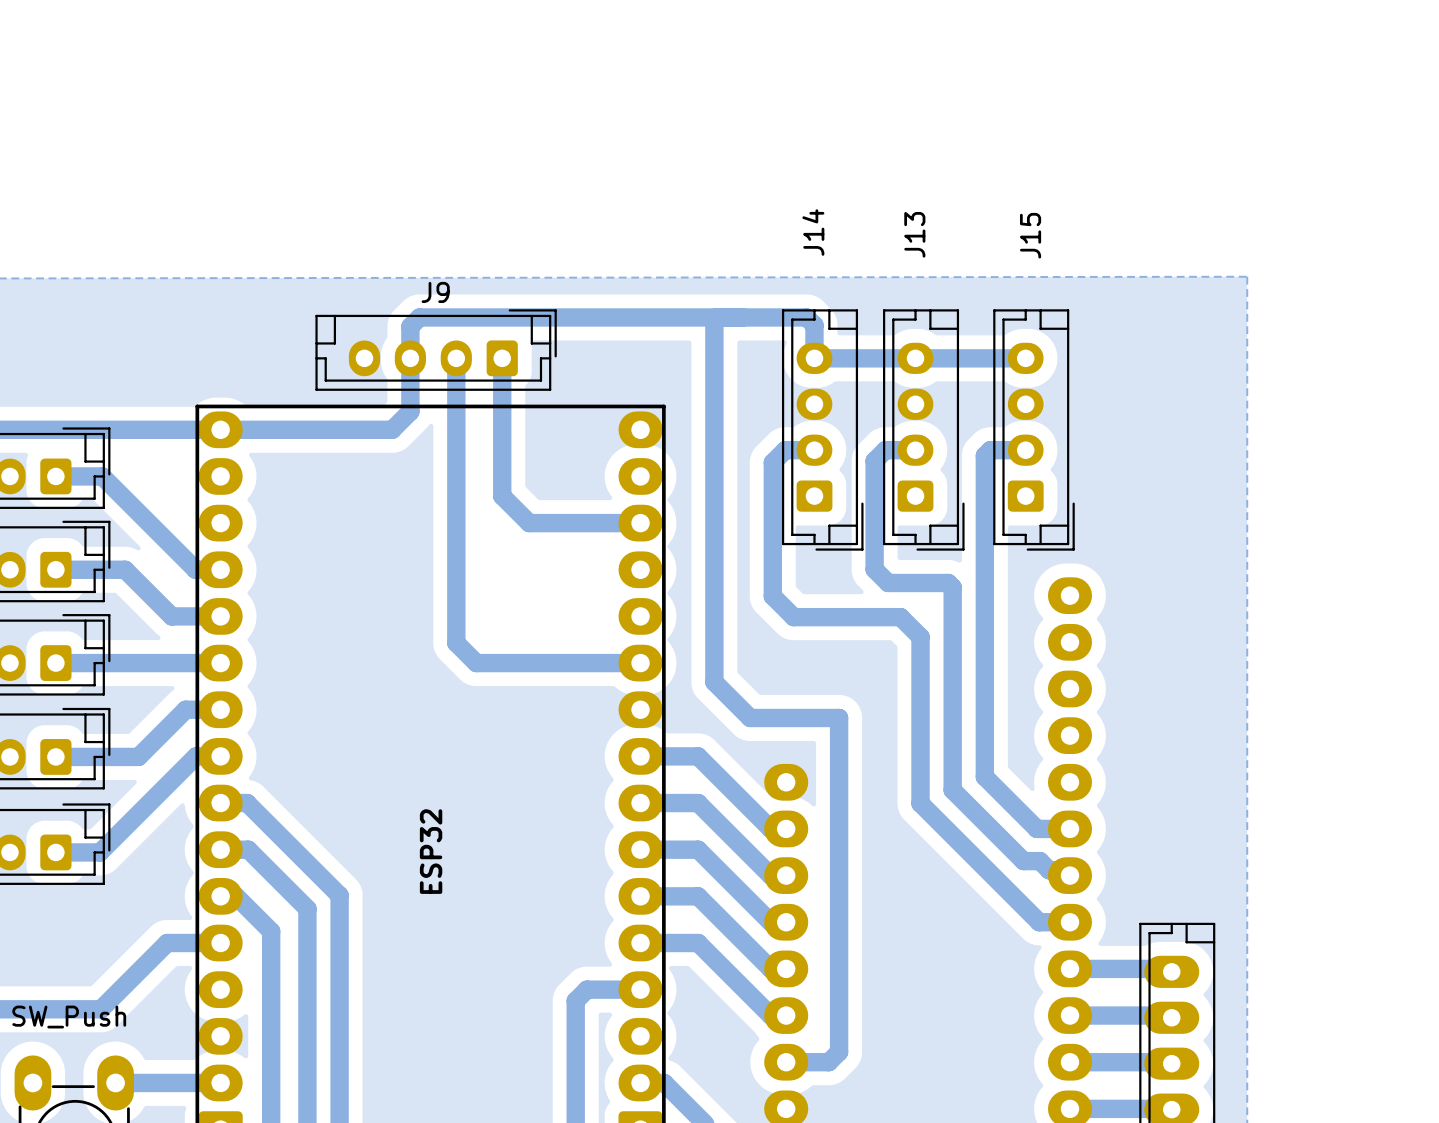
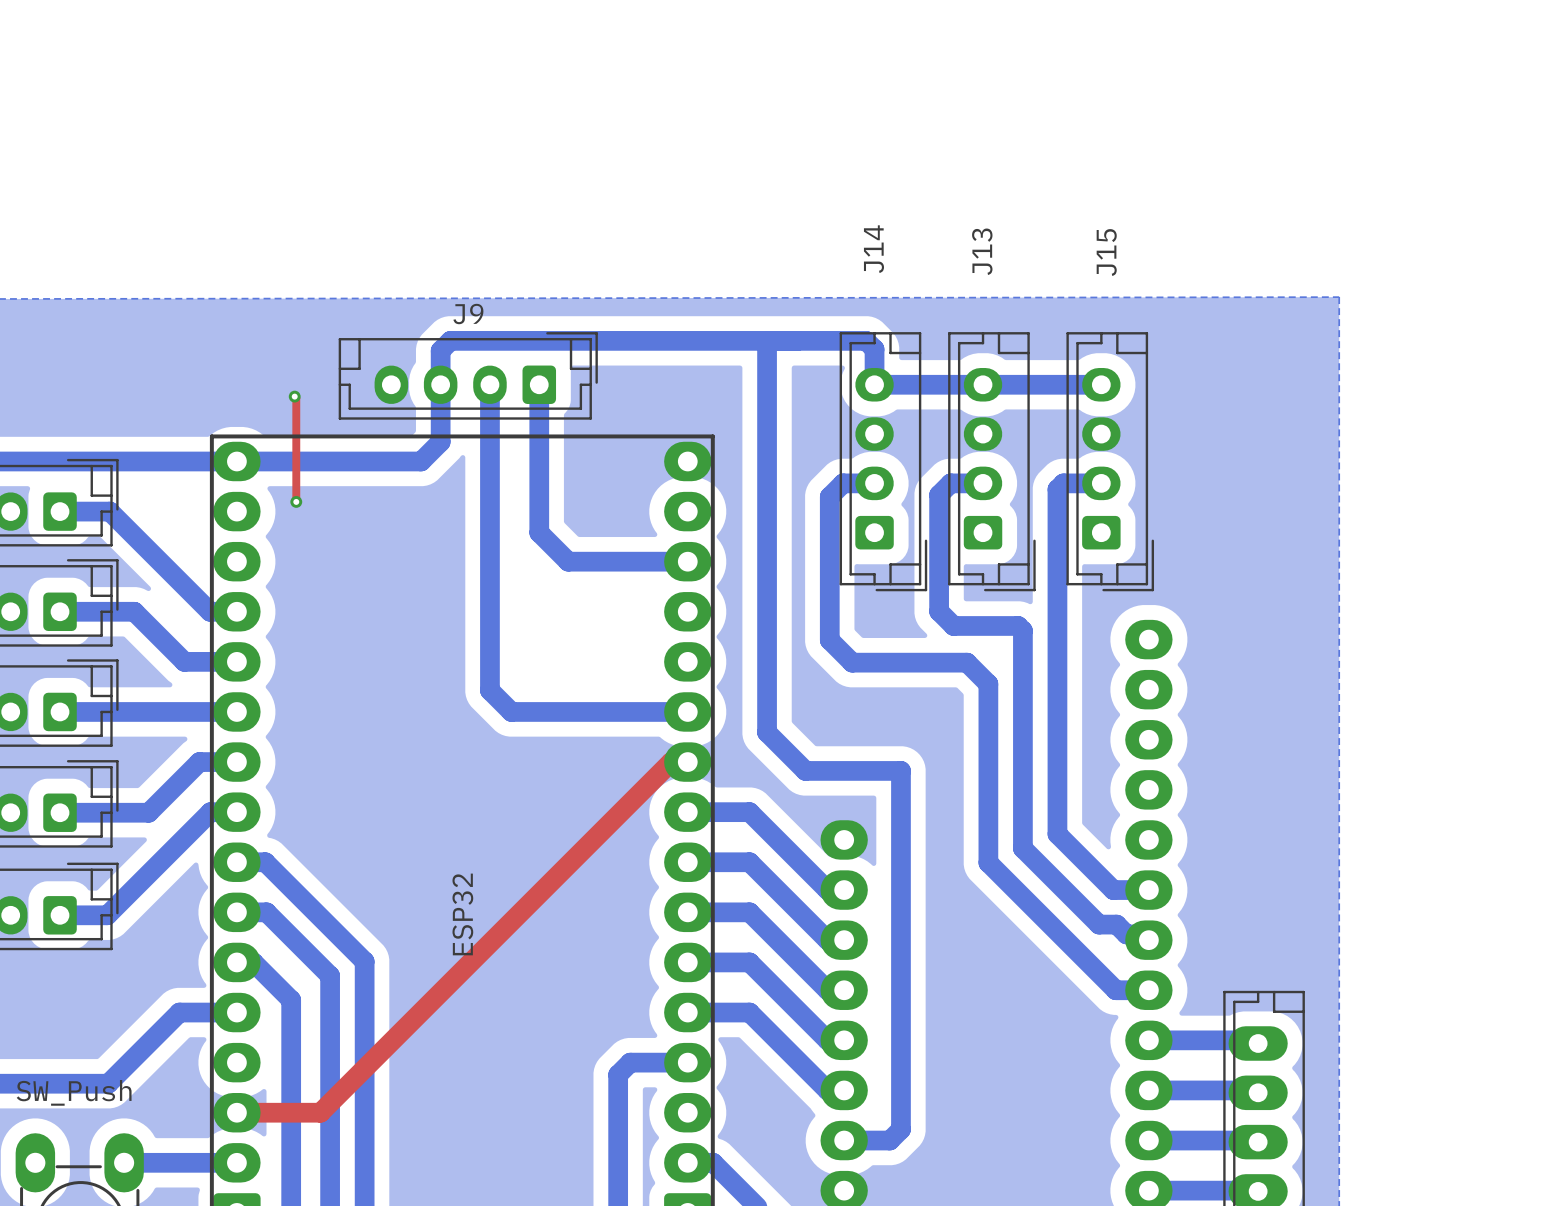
top track: none -> (294, 396) (296, 398) (296, 501)
via: none -> (294, 396)
via: none -> (296, 501)
top track: none -> (687, 762) (671, 762) (320, 1112) (236, 1112)

